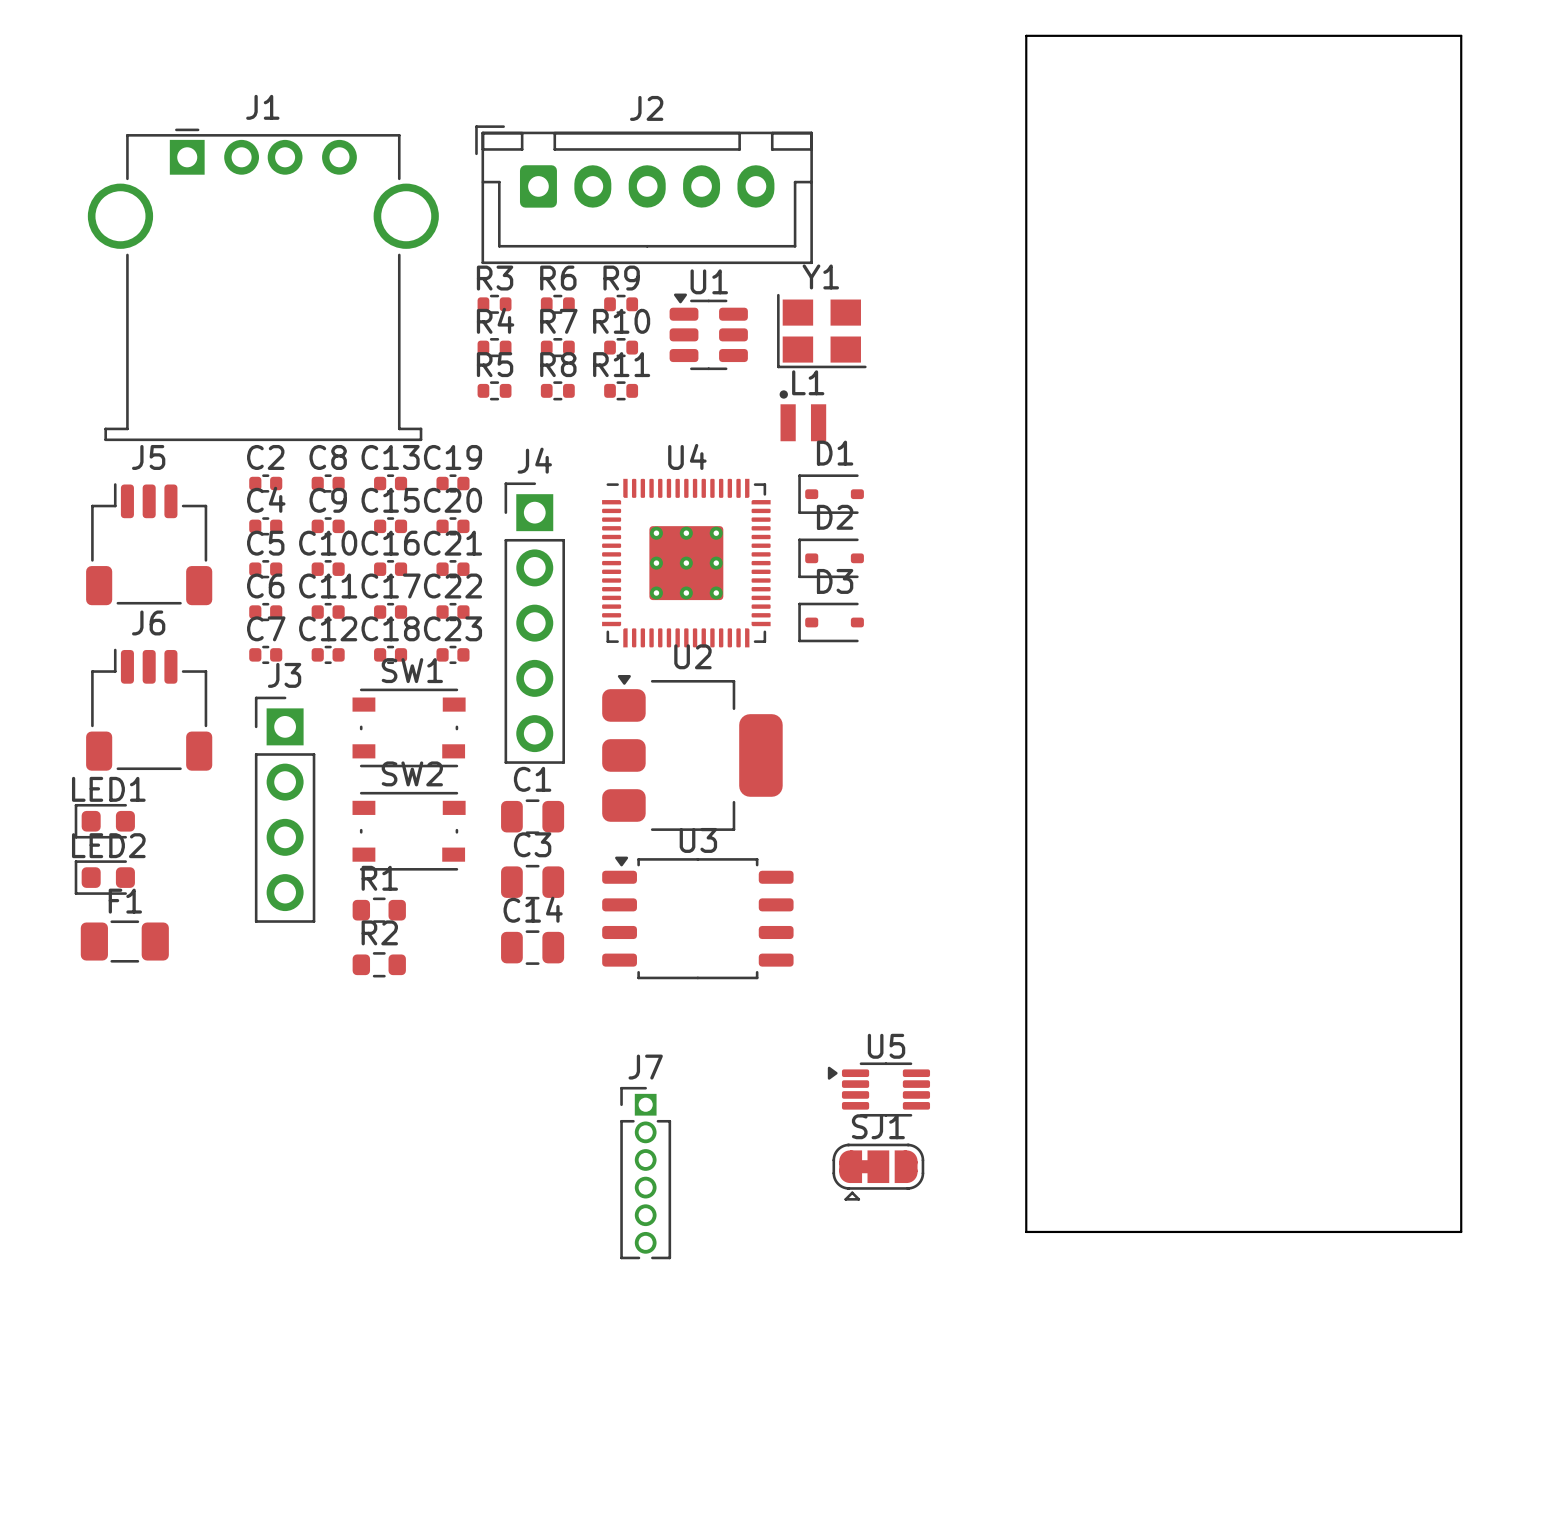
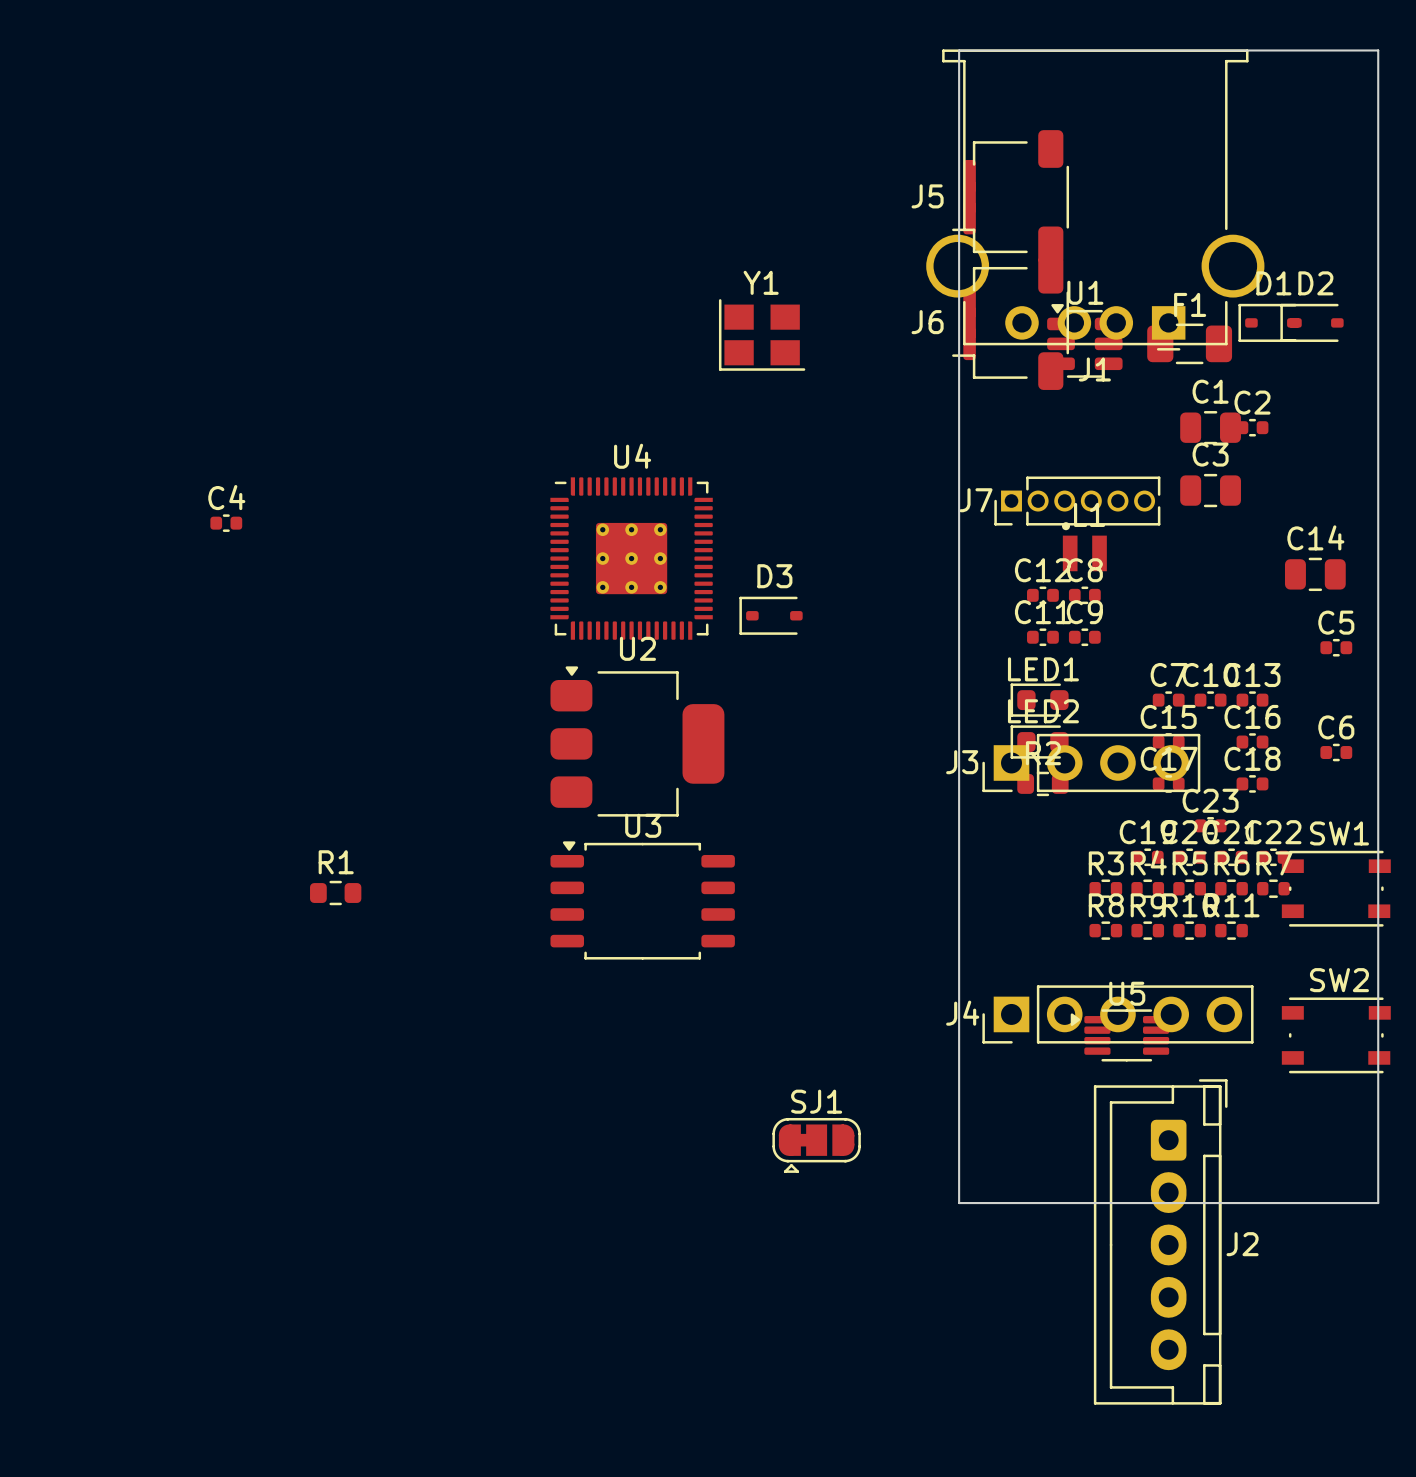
J2 name position: J2 (646, 108) -> J2 (1242, 1244)
J2 footprint: [475, 125, 813, 265] -> [1093, 1079, 1228, 1405]
J1 rotation: 0° (263, 284) -> 180° (1095, 200)
J1 position: (263, 284) -> (1095, 200)
R3 position: (494, 304) -> (1105, 888)
R6 position: (557, 304) -> (1231, 888)
R9 position: (621, 304) -> (1147, 930)
U1 position: (708, 331) -> (1084, 340)
R4 position: (494, 347) -> (1147, 888)
R7 position: (557, 347) -> (1273, 888)
R10 position: (621, 347) -> (1189, 930)
R5 position: (494, 390) -> (1189, 888)
R8 position: (557, 390) -> (1105, 930)
R11 position: (621, 390) -> (1231, 930)
L1 position: (802, 415) -> (1084, 546)
J5 name position: J5 (148, 457) -> J5 (927, 196)
J5 footprint: [86, 483, 213, 606] -> [952, 130, 1070, 265]
C2 position: (265, 483) -> (1252, 427)
C8 position: (328, 483) -> (1084, 595)
C13 position: (390, 483) -> (1252, 700)
C19 position: (452, 483) -> (1147, 857)
D1 position: (831, 494) -> (1270, 322)
C9 position: (328, 526) -> (1084, 637)
C15 position: (390, 526) -> (1168, 742)
C20 position: (452, 526) -> (1189, 857)
D2 position: (831, 558) -> (1312, 322)
C5 position: (265, 569) -> (1336, 647)
C10 position: (328, 569) -> (1210, 700)
C16 position: (390, 569) -> (1252, 742)
C21 position: (452, 569) -> (1231, 857)
C6 position: (265, 612) -> (1336, 752)
C11 position: (328, 612) -> (1042, 637)
C17 position: (390, 612) -> (1168, 783)
C22 position: (452, 612) -> (1273, 857)
J6 name position: J6 (148, 622) -> J6 (927, 322)
J4 rotation: 0° (534, 623) -> 90° counterclockwise (1117, 1014)
J4 position: (534, 623) -> (1117, 1014)
J6 footprint: [86, 648, 213, 771] -> [952, 255, 1070, 390]
C7 position: (265, 654) -> (1168, 700)
C12 position: (328, 654) -> (1042, 595)
C18 position: (390, 654) -> (1252, 783)
C23 position: (452, 654) -> (1210, 825)
SW1 position: (409, 727) -> (1336, 888)
J3 rotation: 0° (285, 809) -> 90° counterclockwise (1091, 762)
J3 position: (285, 809) -> (1091, 762)
C1 position: (532, 816) -> (1210, 427)
LED1 position: (104, 821) -> (1039, 700)
SW2 position: (409, 831) -> (1336, 1035)
LED2 position: (104, 877) -> (1039, 742)
C3 position: (532, 882) -> (1210, 490)
F1 position: (124, 941) -> (1189, 343)
C14 position: (532, 947) -> (1315, 574)
R2 position: (379, 964) -> (1042, 783)
U5 position: (878, 1089) -> (1119, 1035)
J7 rotation: 0° (645, 1173) -> 90° counterclockwise (1077, 501)
J7 position: (645, 1173) -> (1077, 501)

